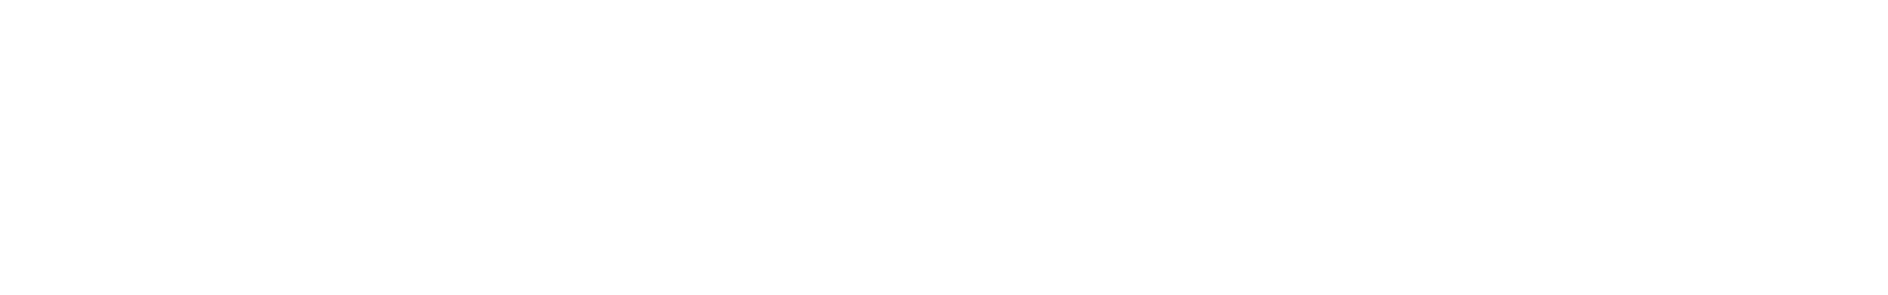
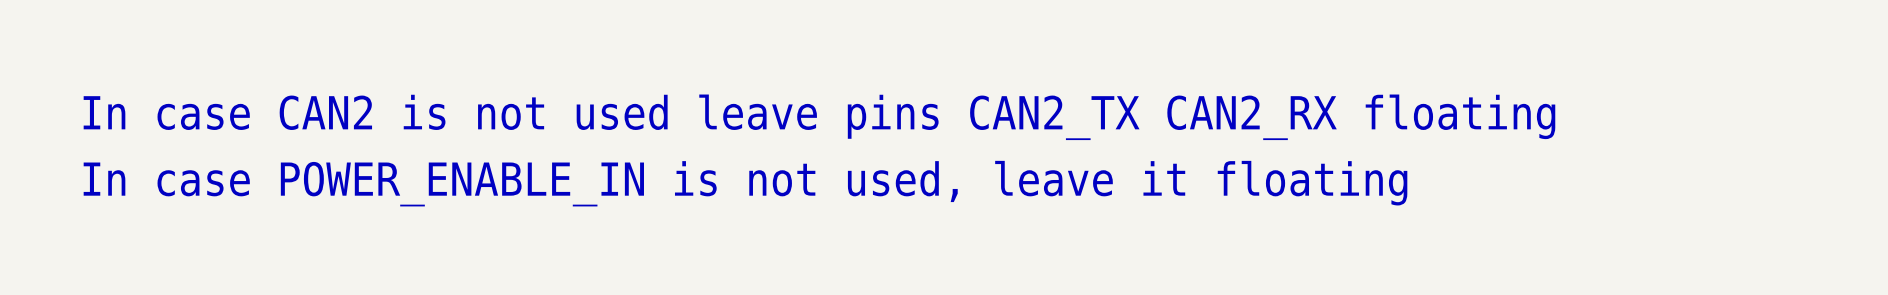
text: none -> In case CAN2 is not used leave pins CAN2_TX CAN2_RX floating (819, 117)
text: none -> In case POWER_ENABLE_IN is not used, leave it floating (745, 183)

